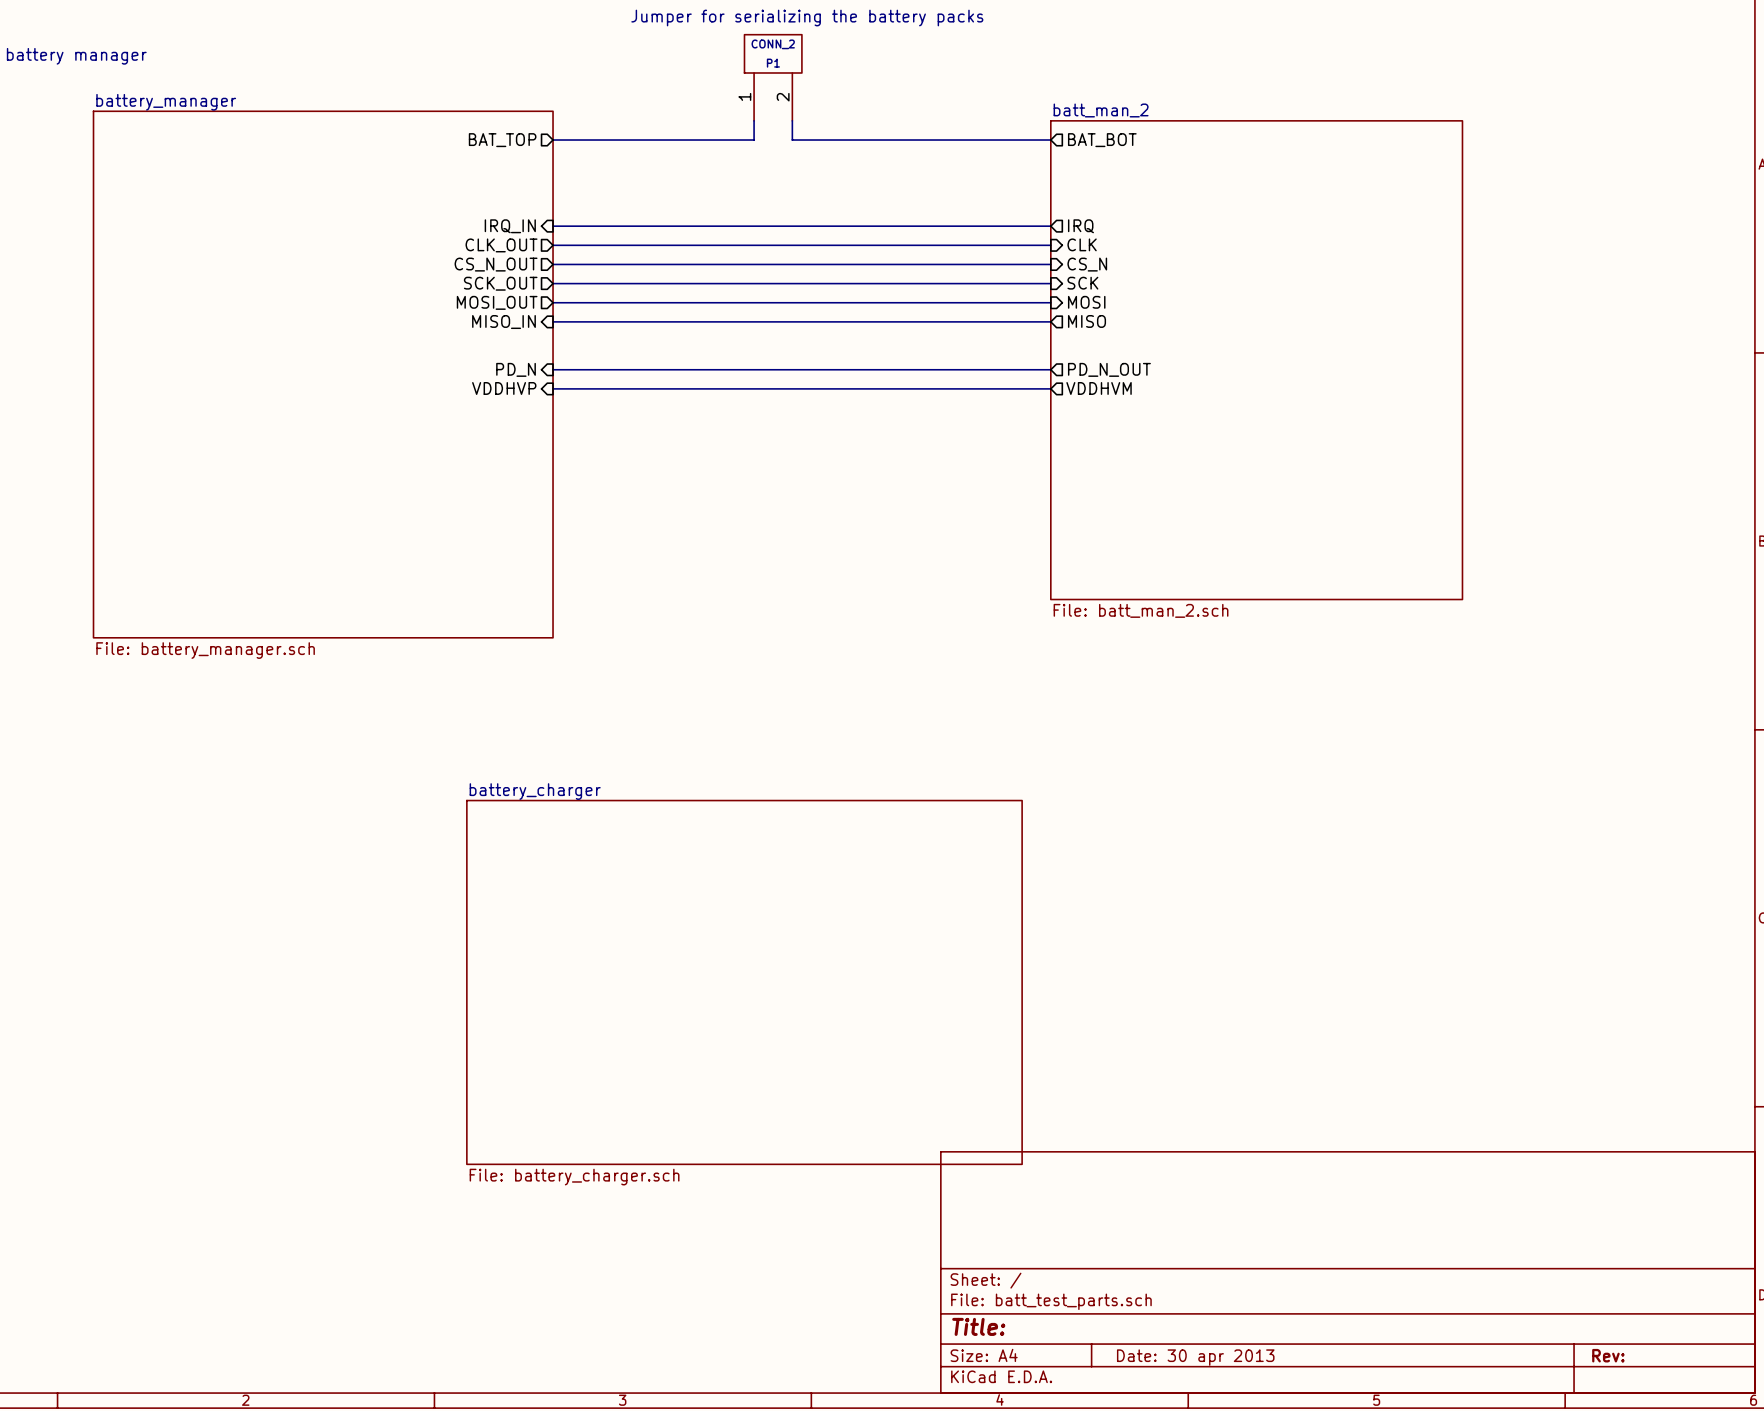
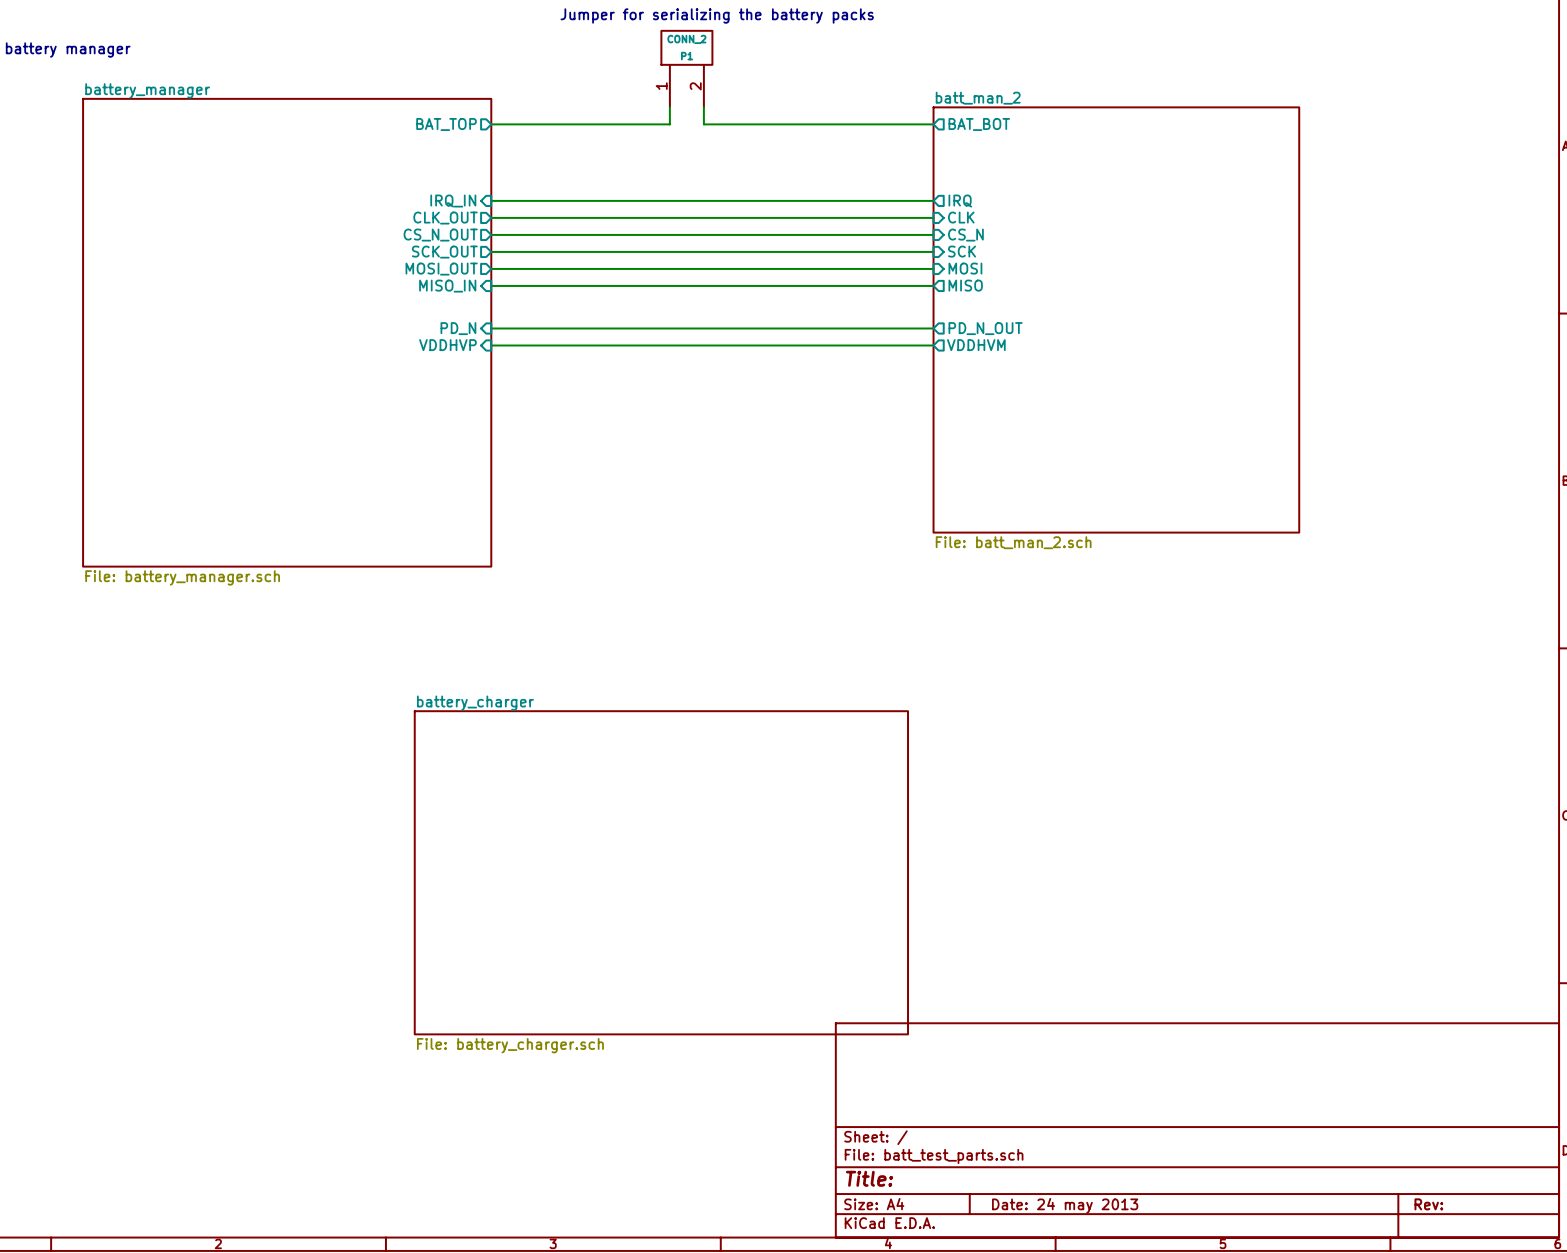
title block: Date: 30 apr 2013 (1195, 1357) -> Date: 24 may 2013 (1065, 1205)

